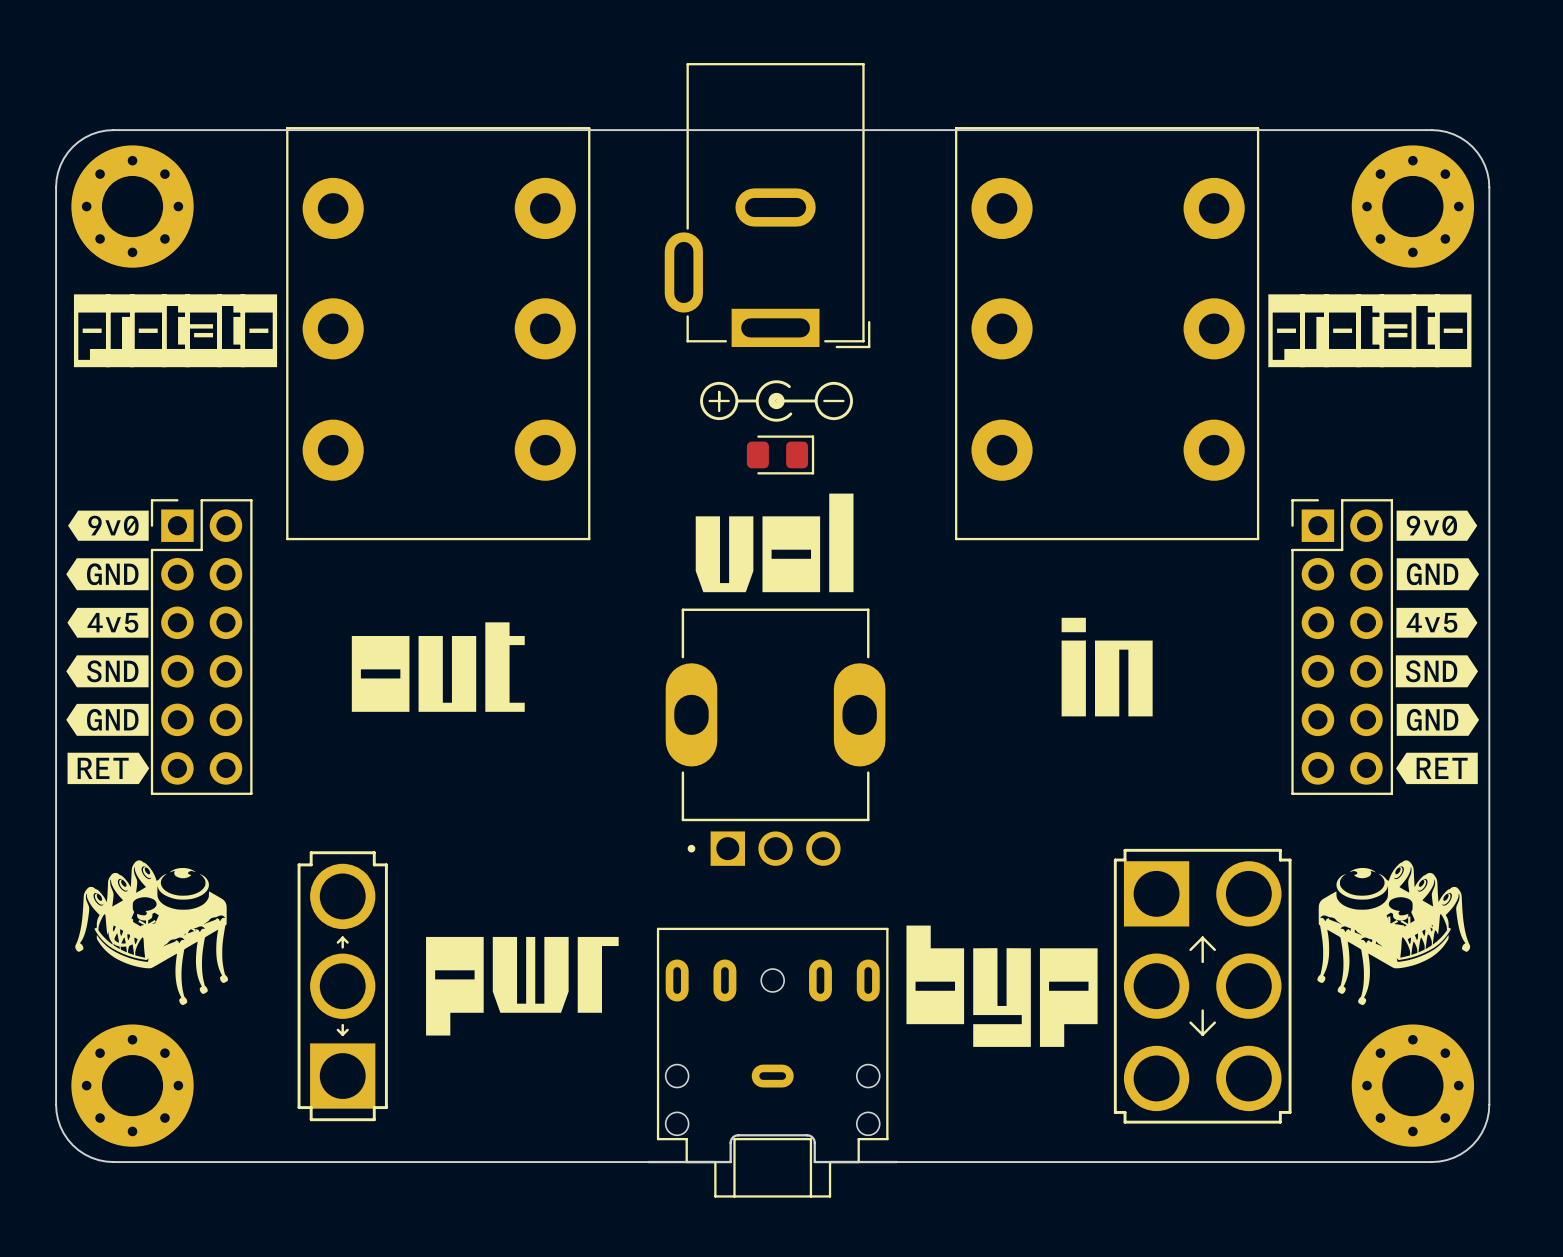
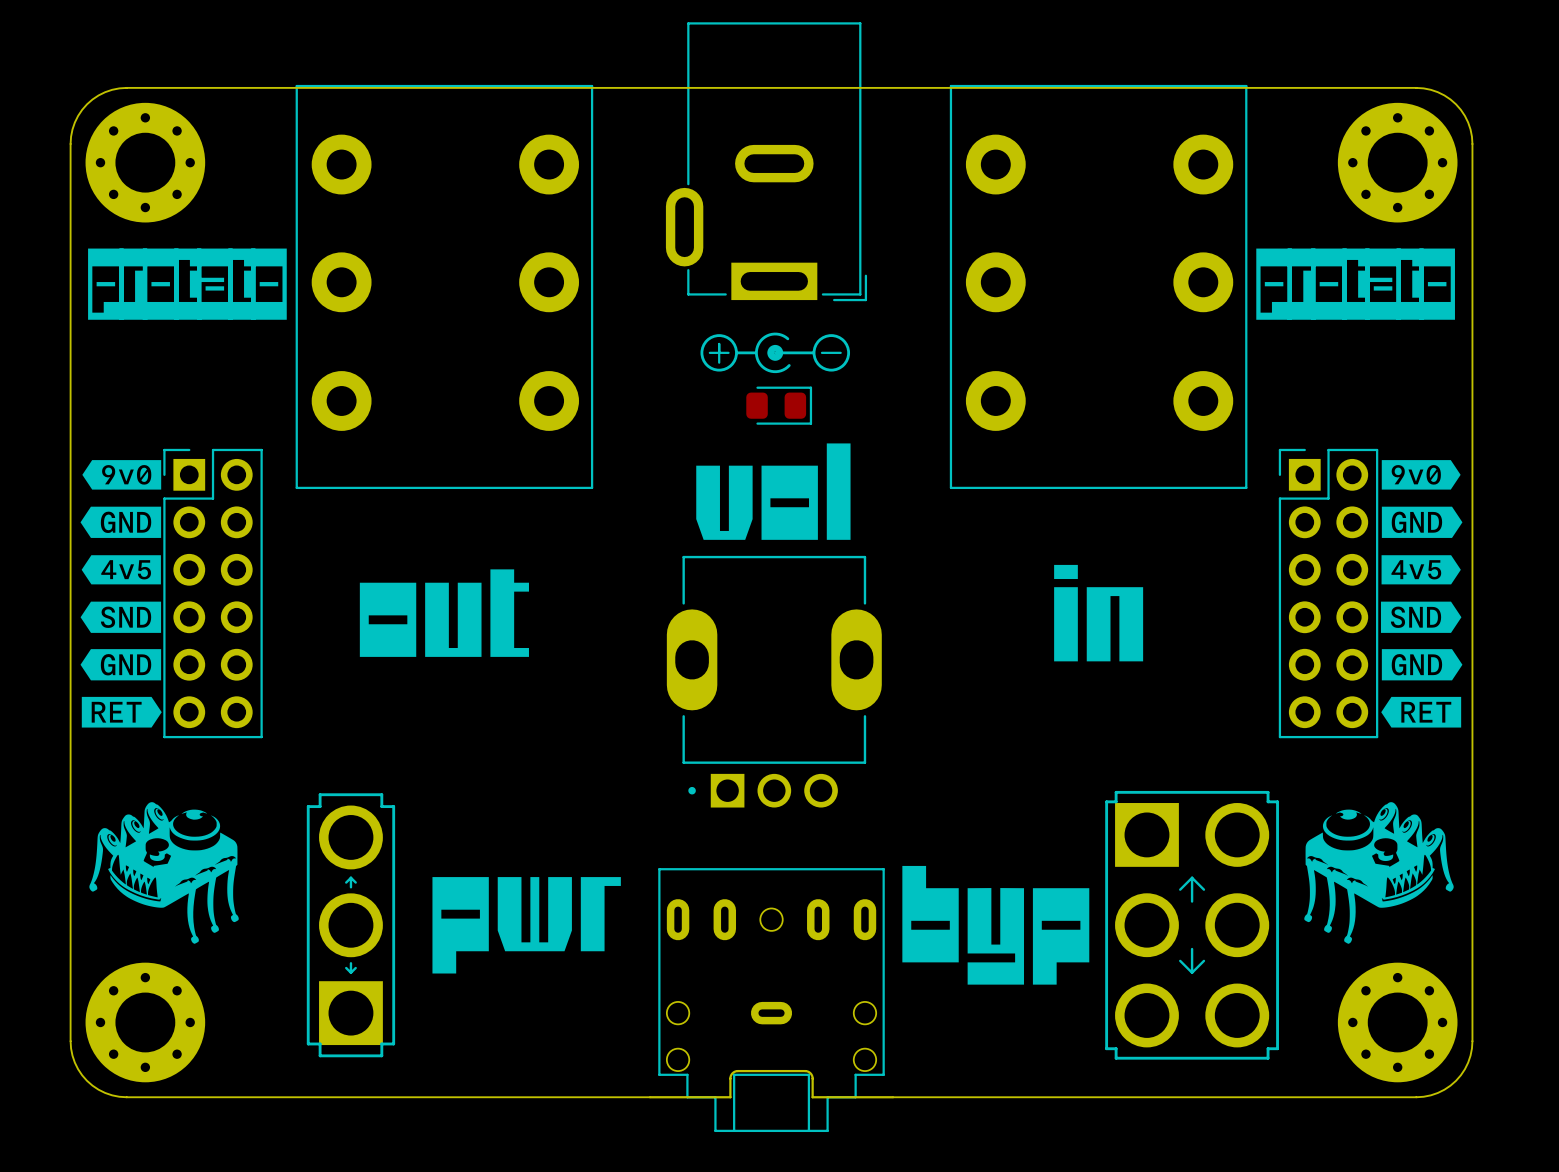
drawing: none -> [89, 802, 239, 944]
drawing: none -> [1304, 802, 1454, 944]
part: (151, 932) -> none
part: (1393, 932) -> none

